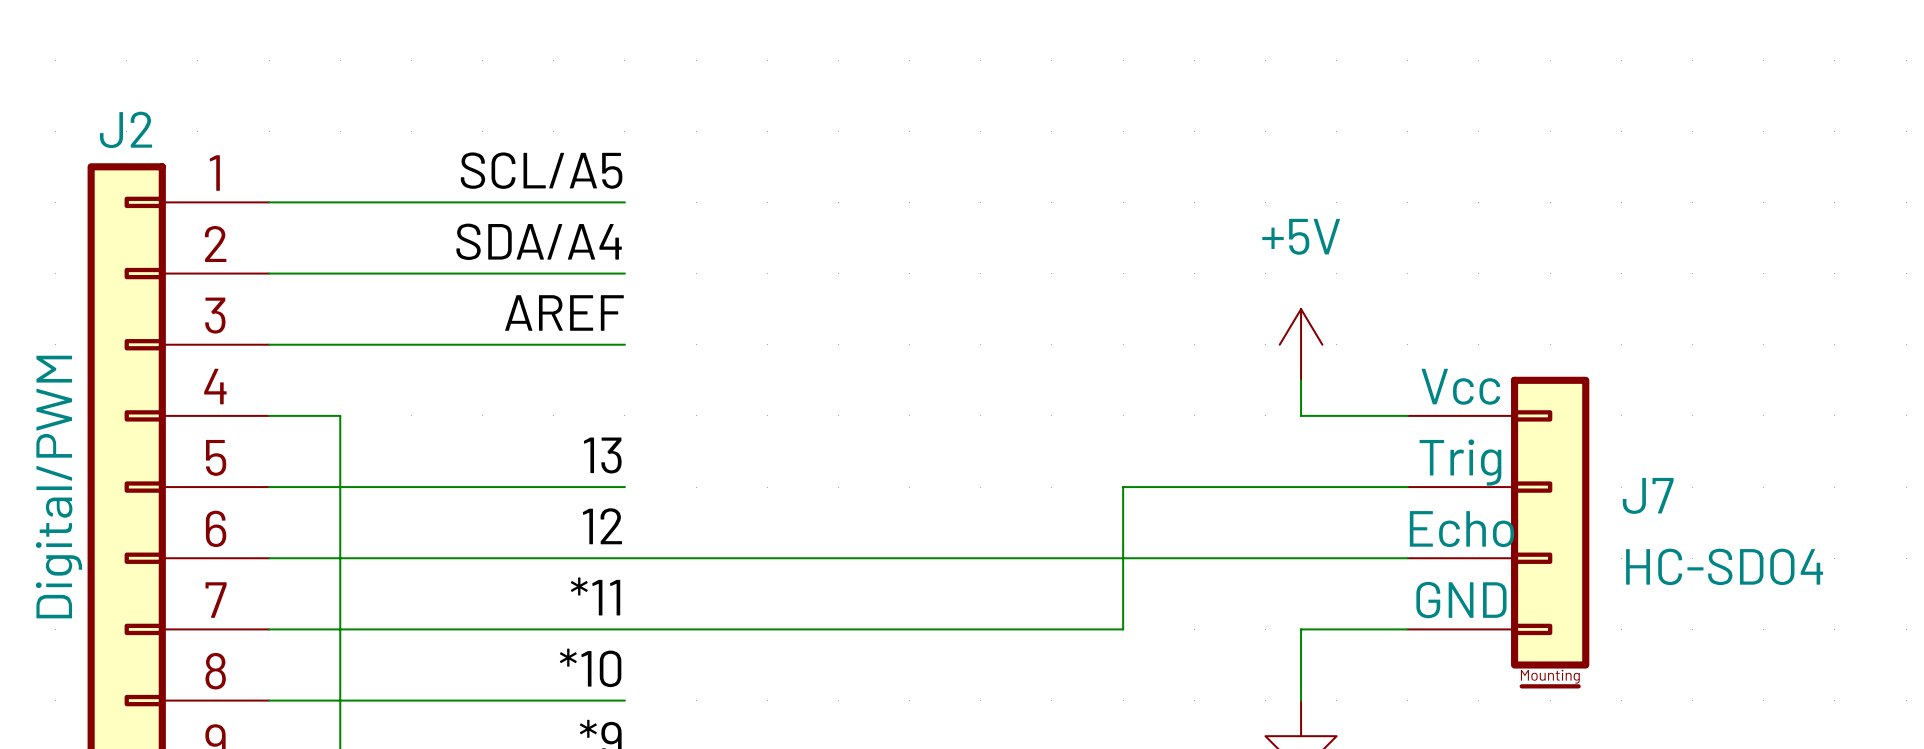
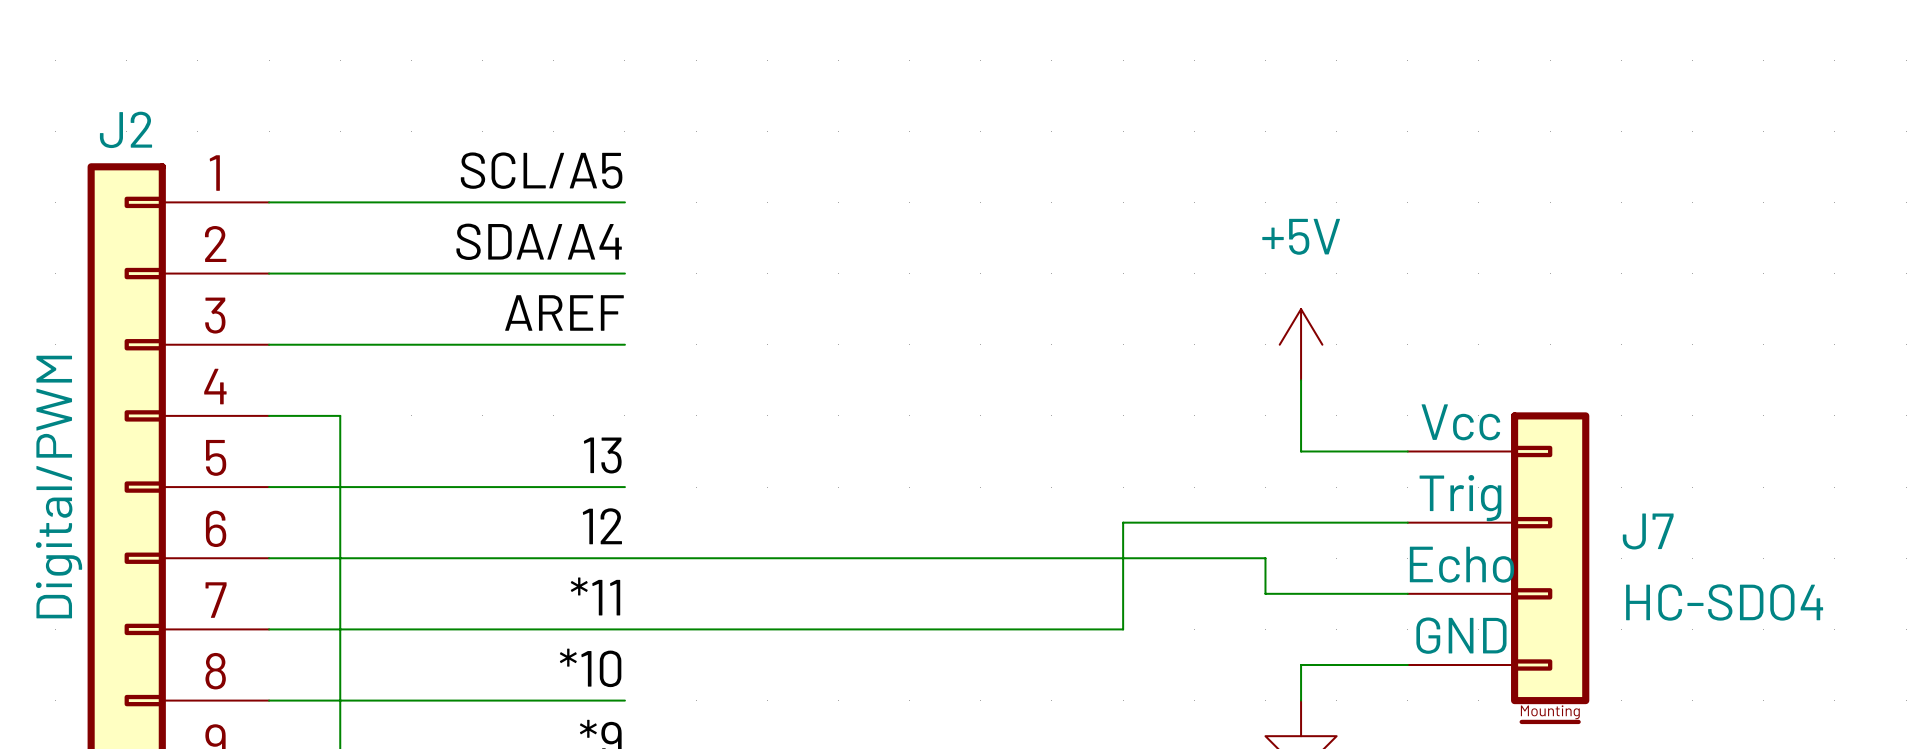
wire: (1301, 415) (1407, 415) -> (1301, 415) (1301, 451) (1407, 451)
wire: (1407, 487) (1123, 487) (1123, 522) -> (1407, 522) (1123, 522)
J7 position: HC-SDO4 (1498, 532) -> HC-SDO4 (1498, 568)
wire: (1265, 558) (1407, 558) -> (1265, 558) (1265, 593) (1407, 593)
wire: (1407, 629) (1301, 629) (1301, 665) -> (1407, 665) (1301, 665)

